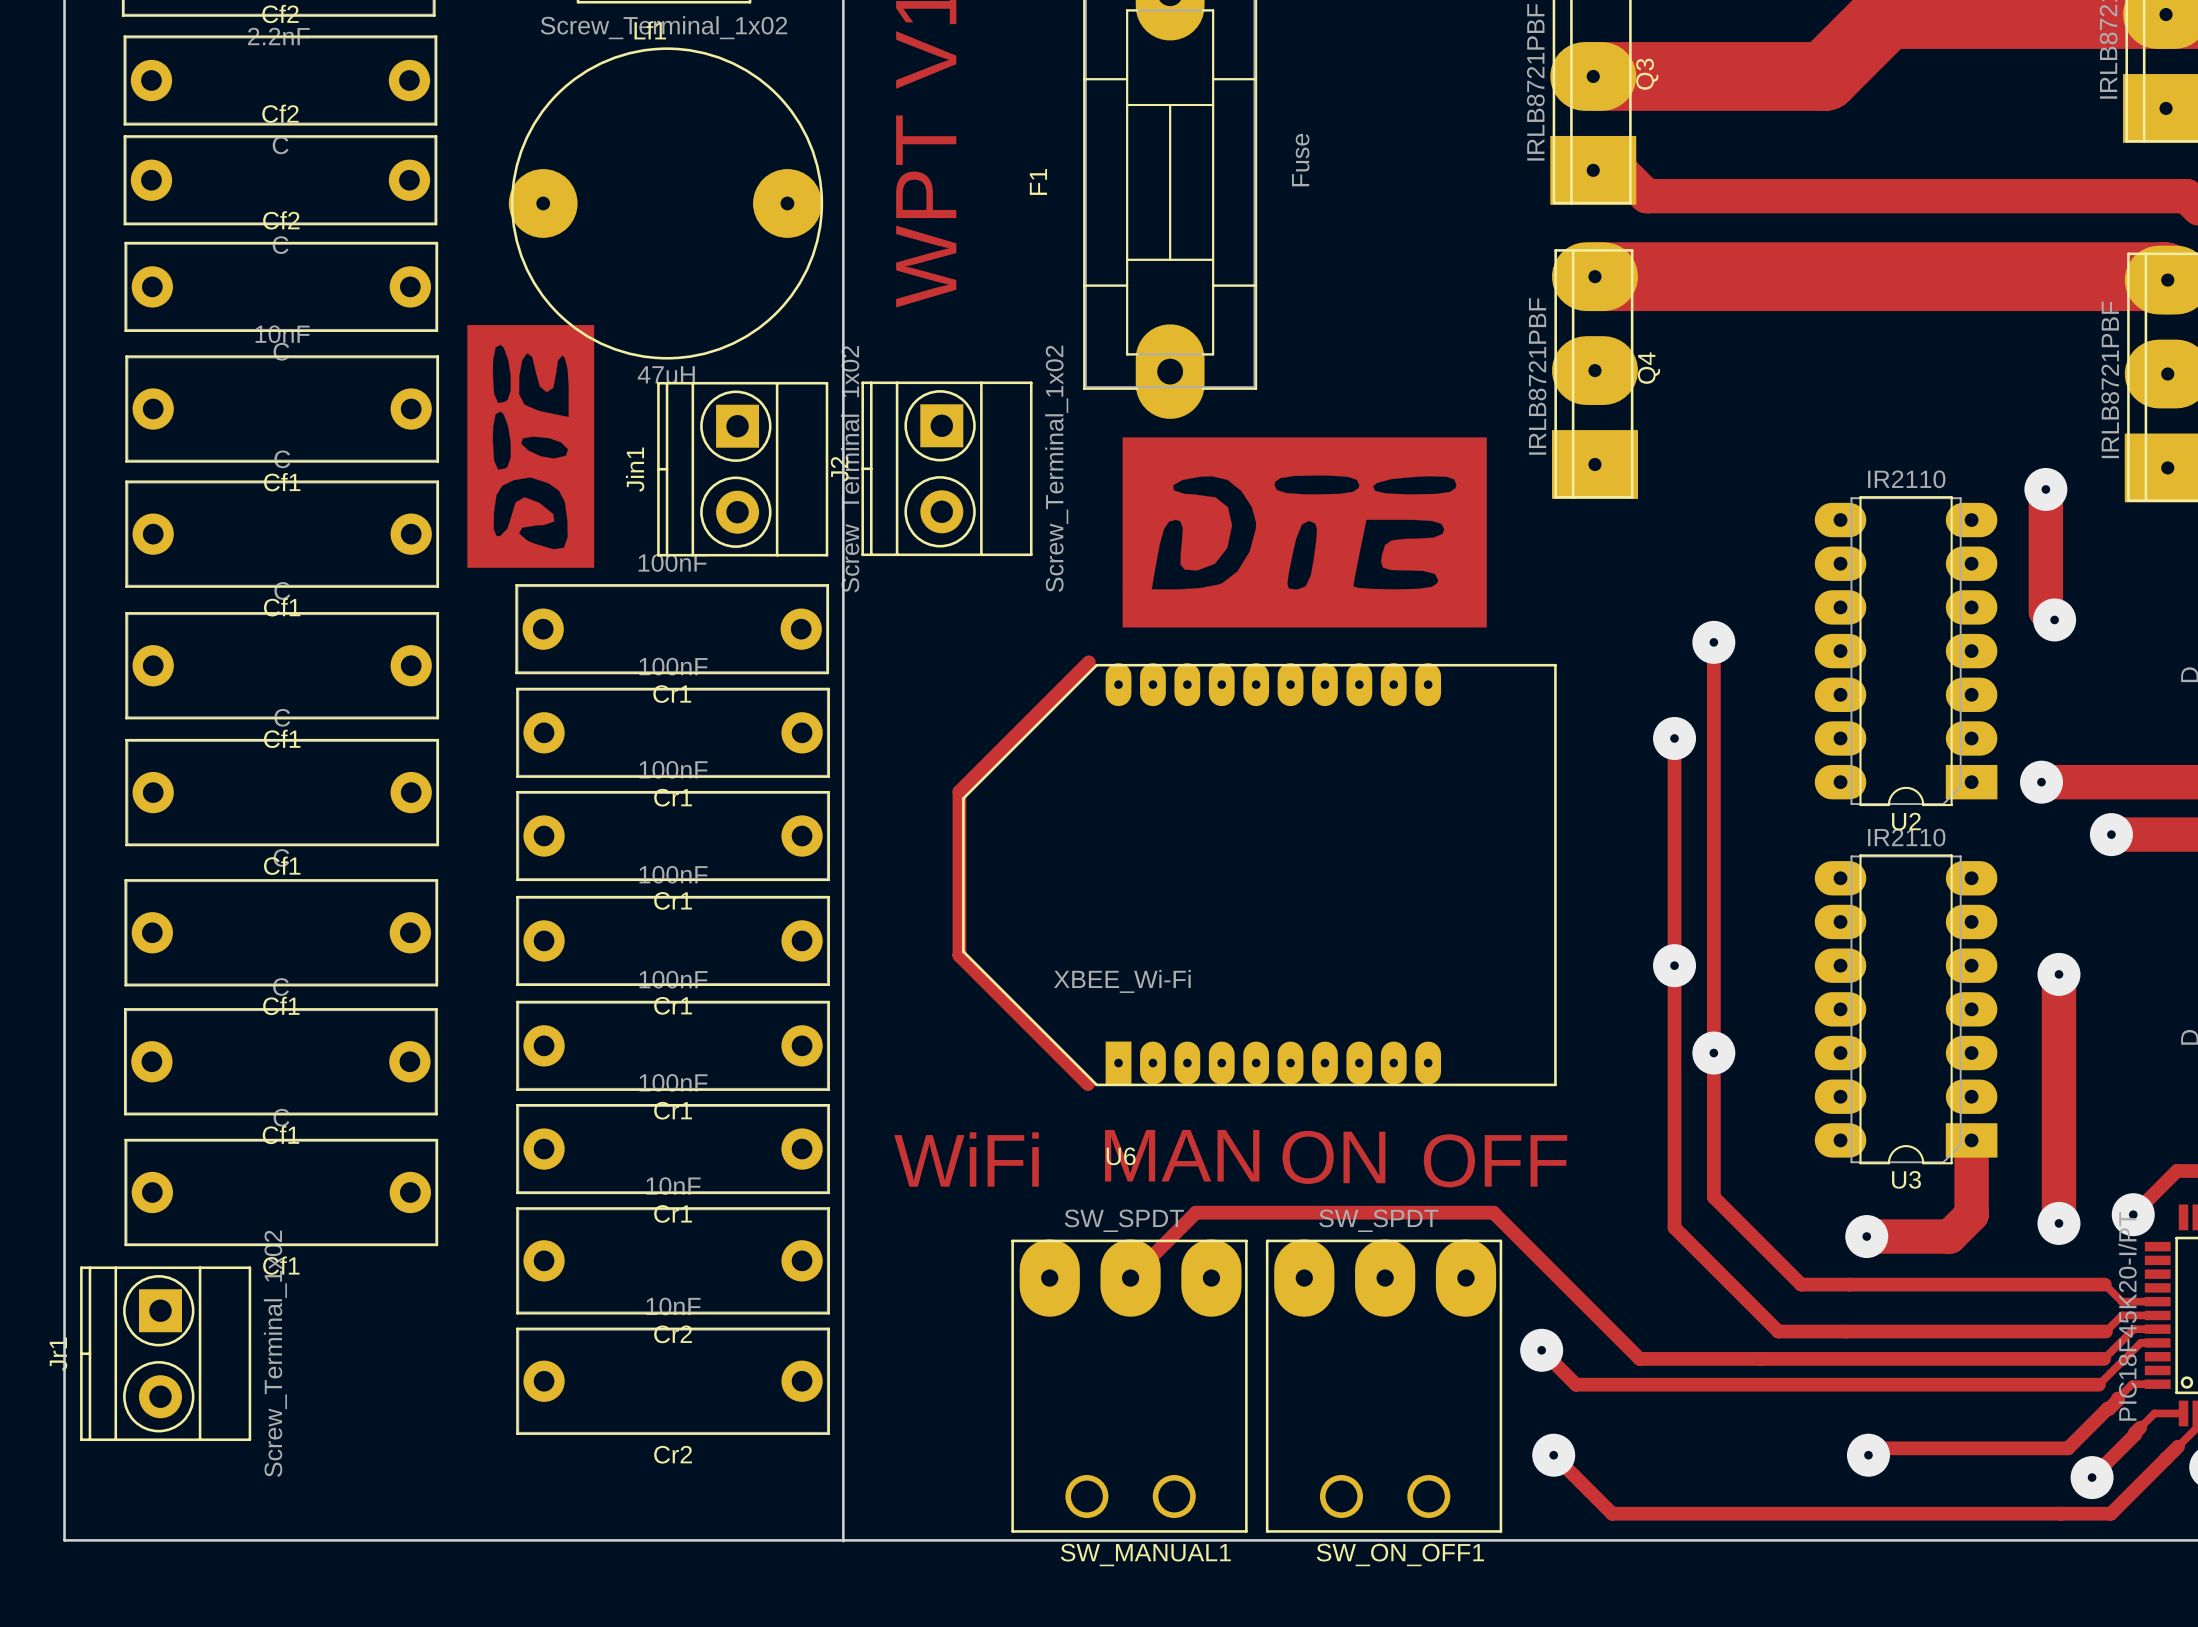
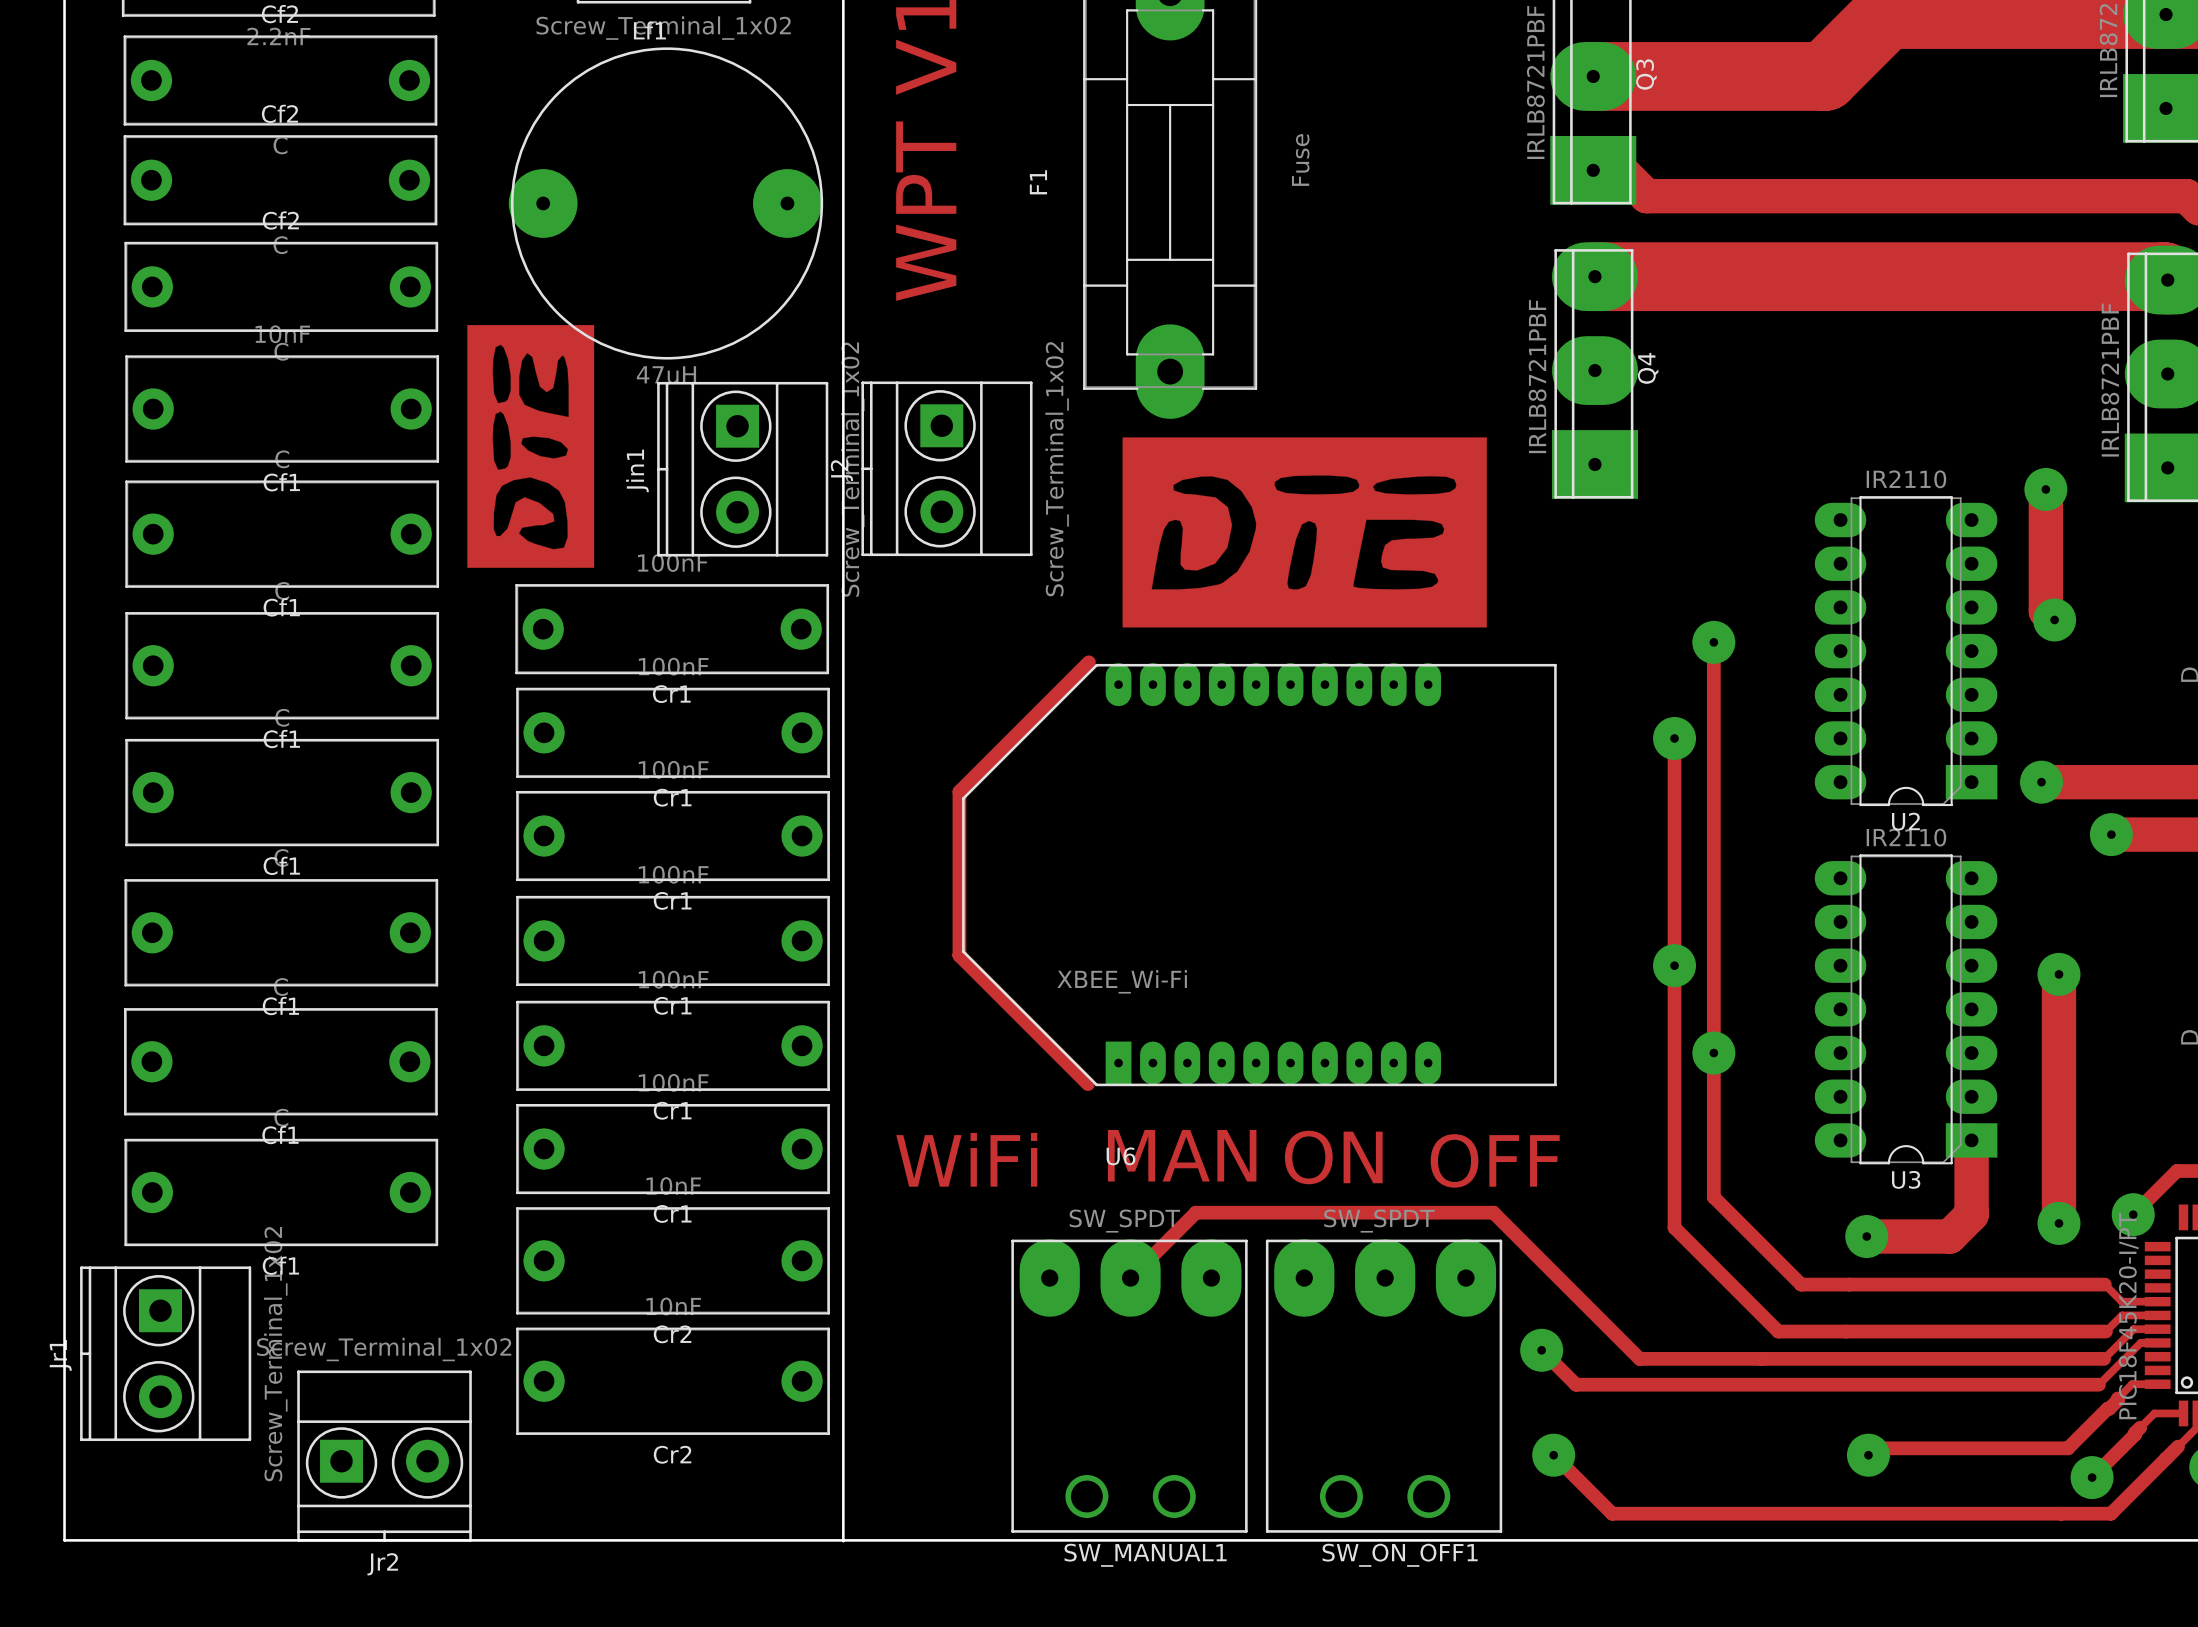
Jr2: none -> Screw_Terminal_1x02 (384, 1456)

